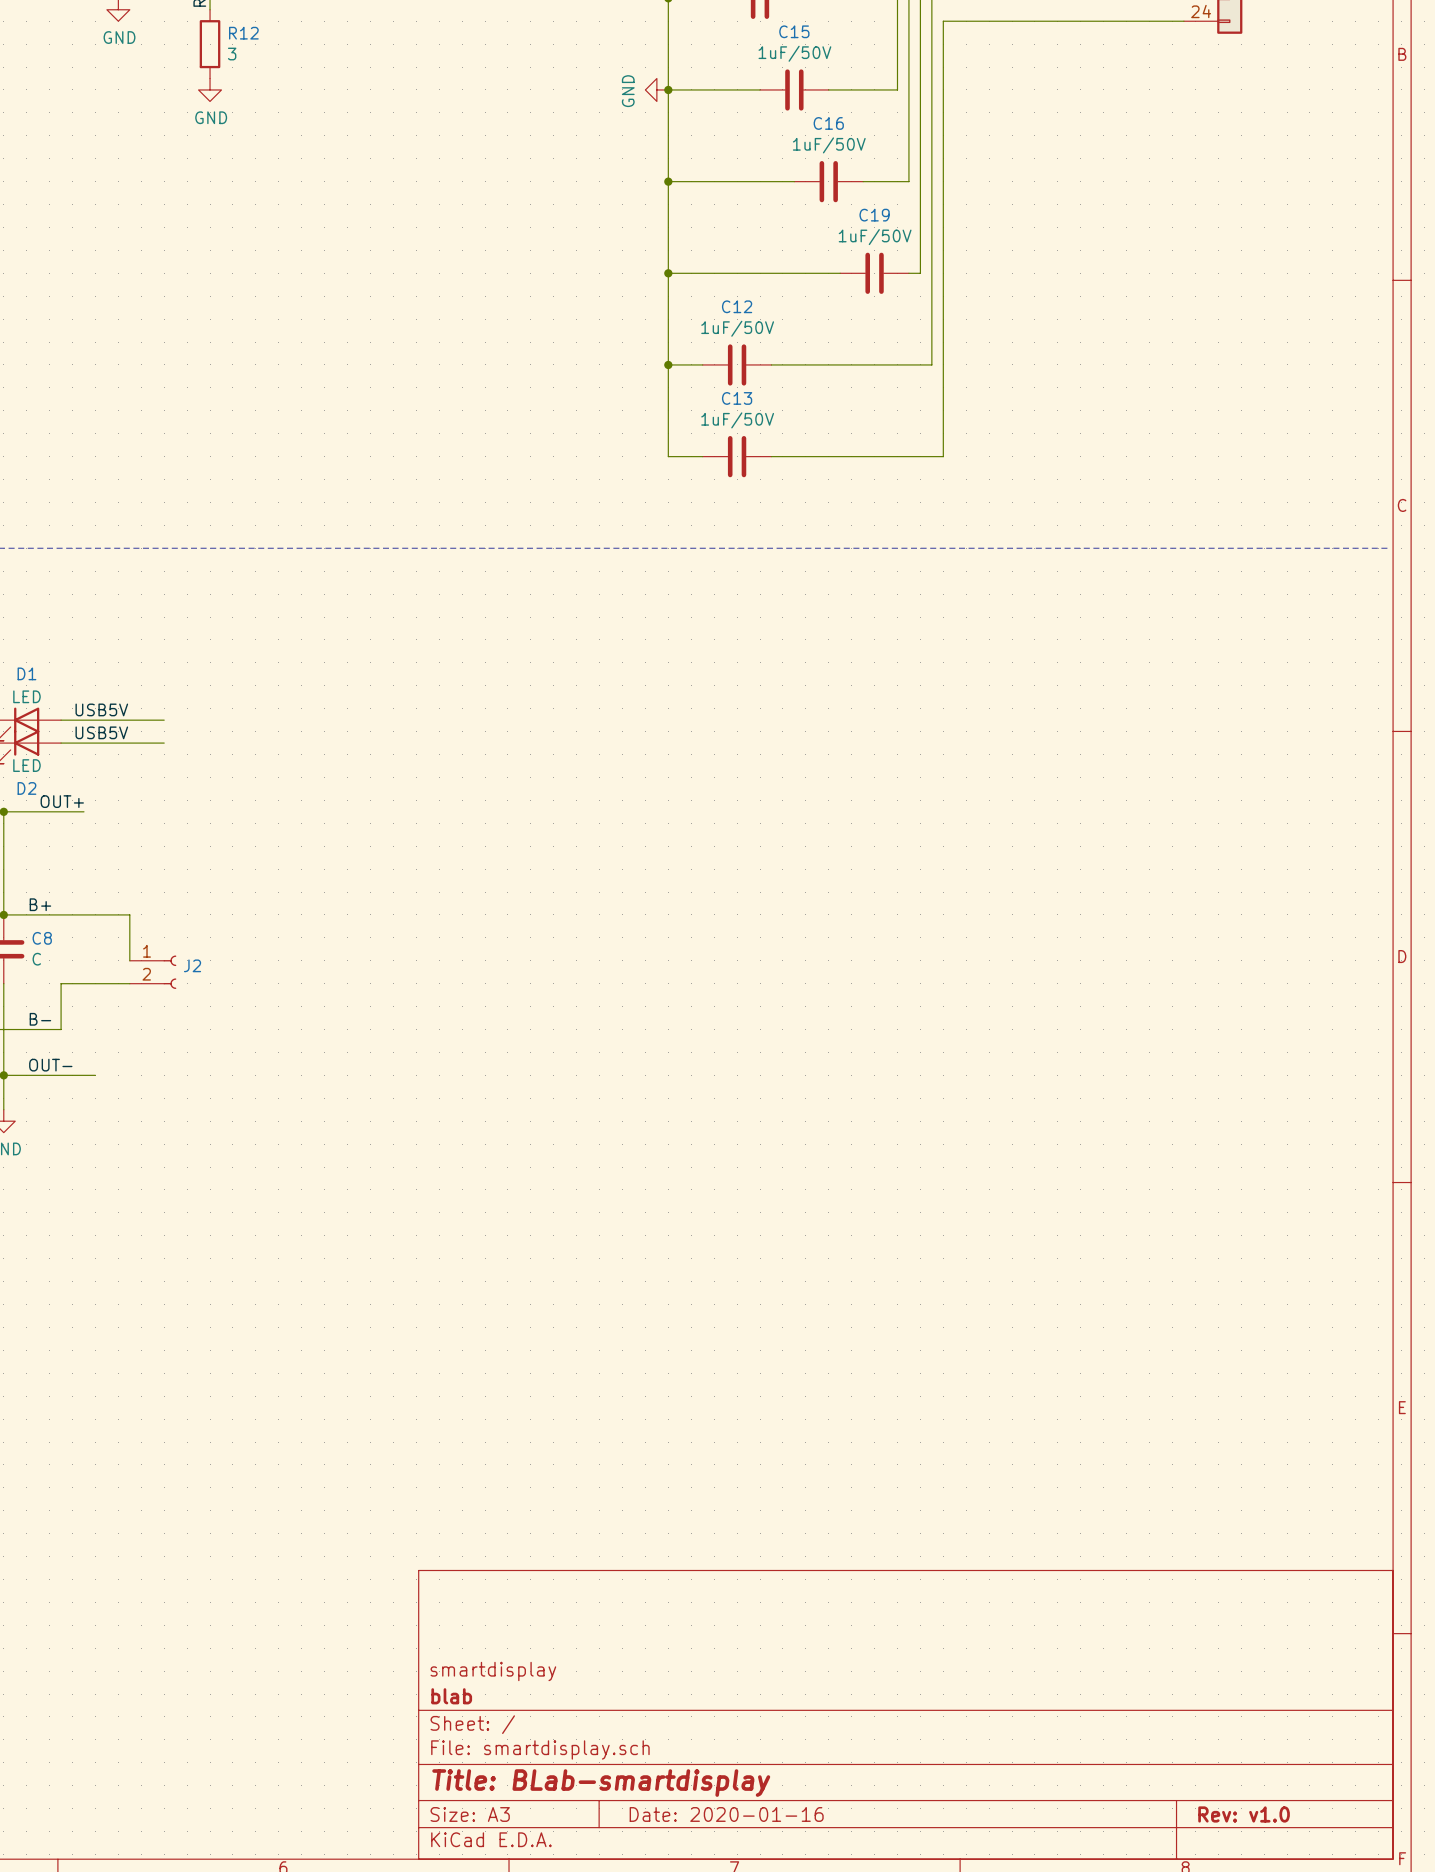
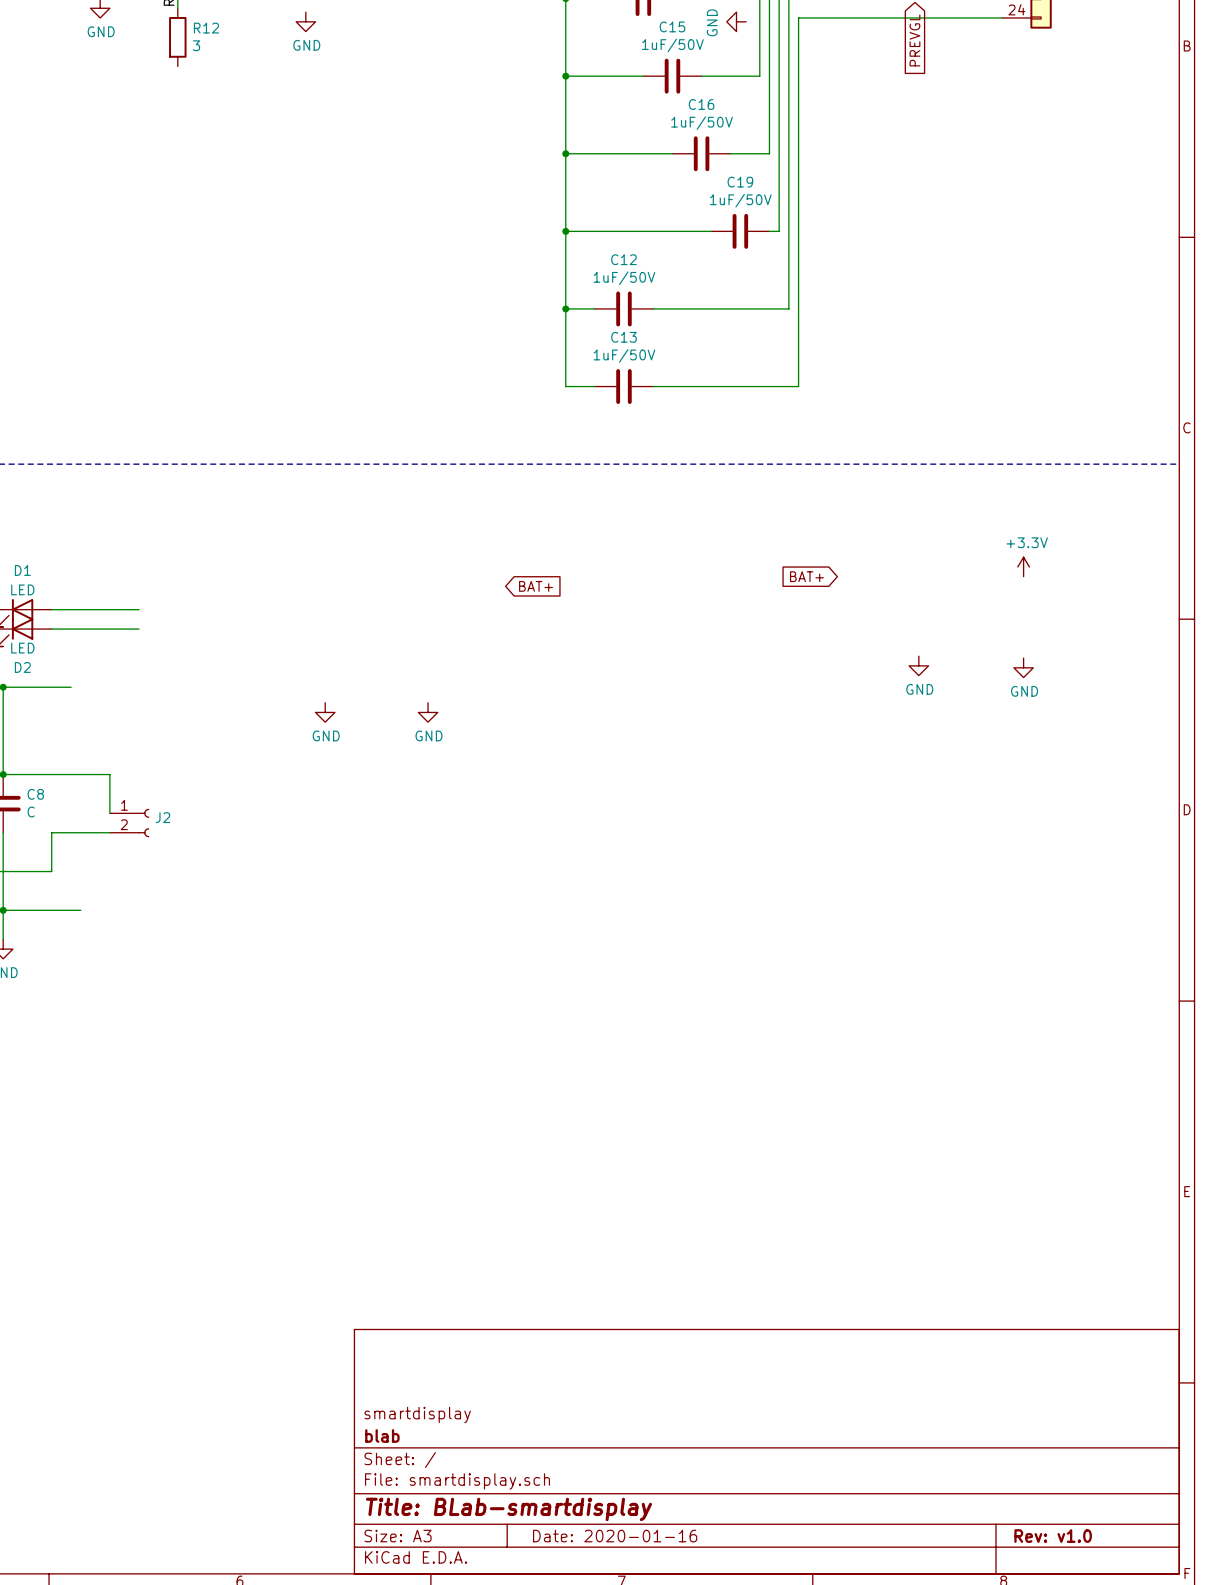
power symbol: none -> GND (305, 21)
power symbol: none -> GND (736, 21)
global label: none -> PREVGL (914, 40)
power symbol: GND (210, 89) -> none
power symbol: GND (656, 89) -> none
power symbol: none -> +3.3V (1023, 566)
global label: none -> BAT+ (806, 576)
global label: none -> BAT+ (536, 586)
label: USB5V (101, 709) -> none
label: USB5V (101, 732) -> none
power symbol: none -> GND (918, 665)
power symbol: none -> GND (1023, 667)
label: OUT+ (62, 801) -> none
power symbol: none -> GND (325, 712)
power symbol: none -> GND (428, 712)
label: B+ (40, 904) -> none
label: B- (40, 1019) -> none
label: OUT- (50, 1065) -> none

